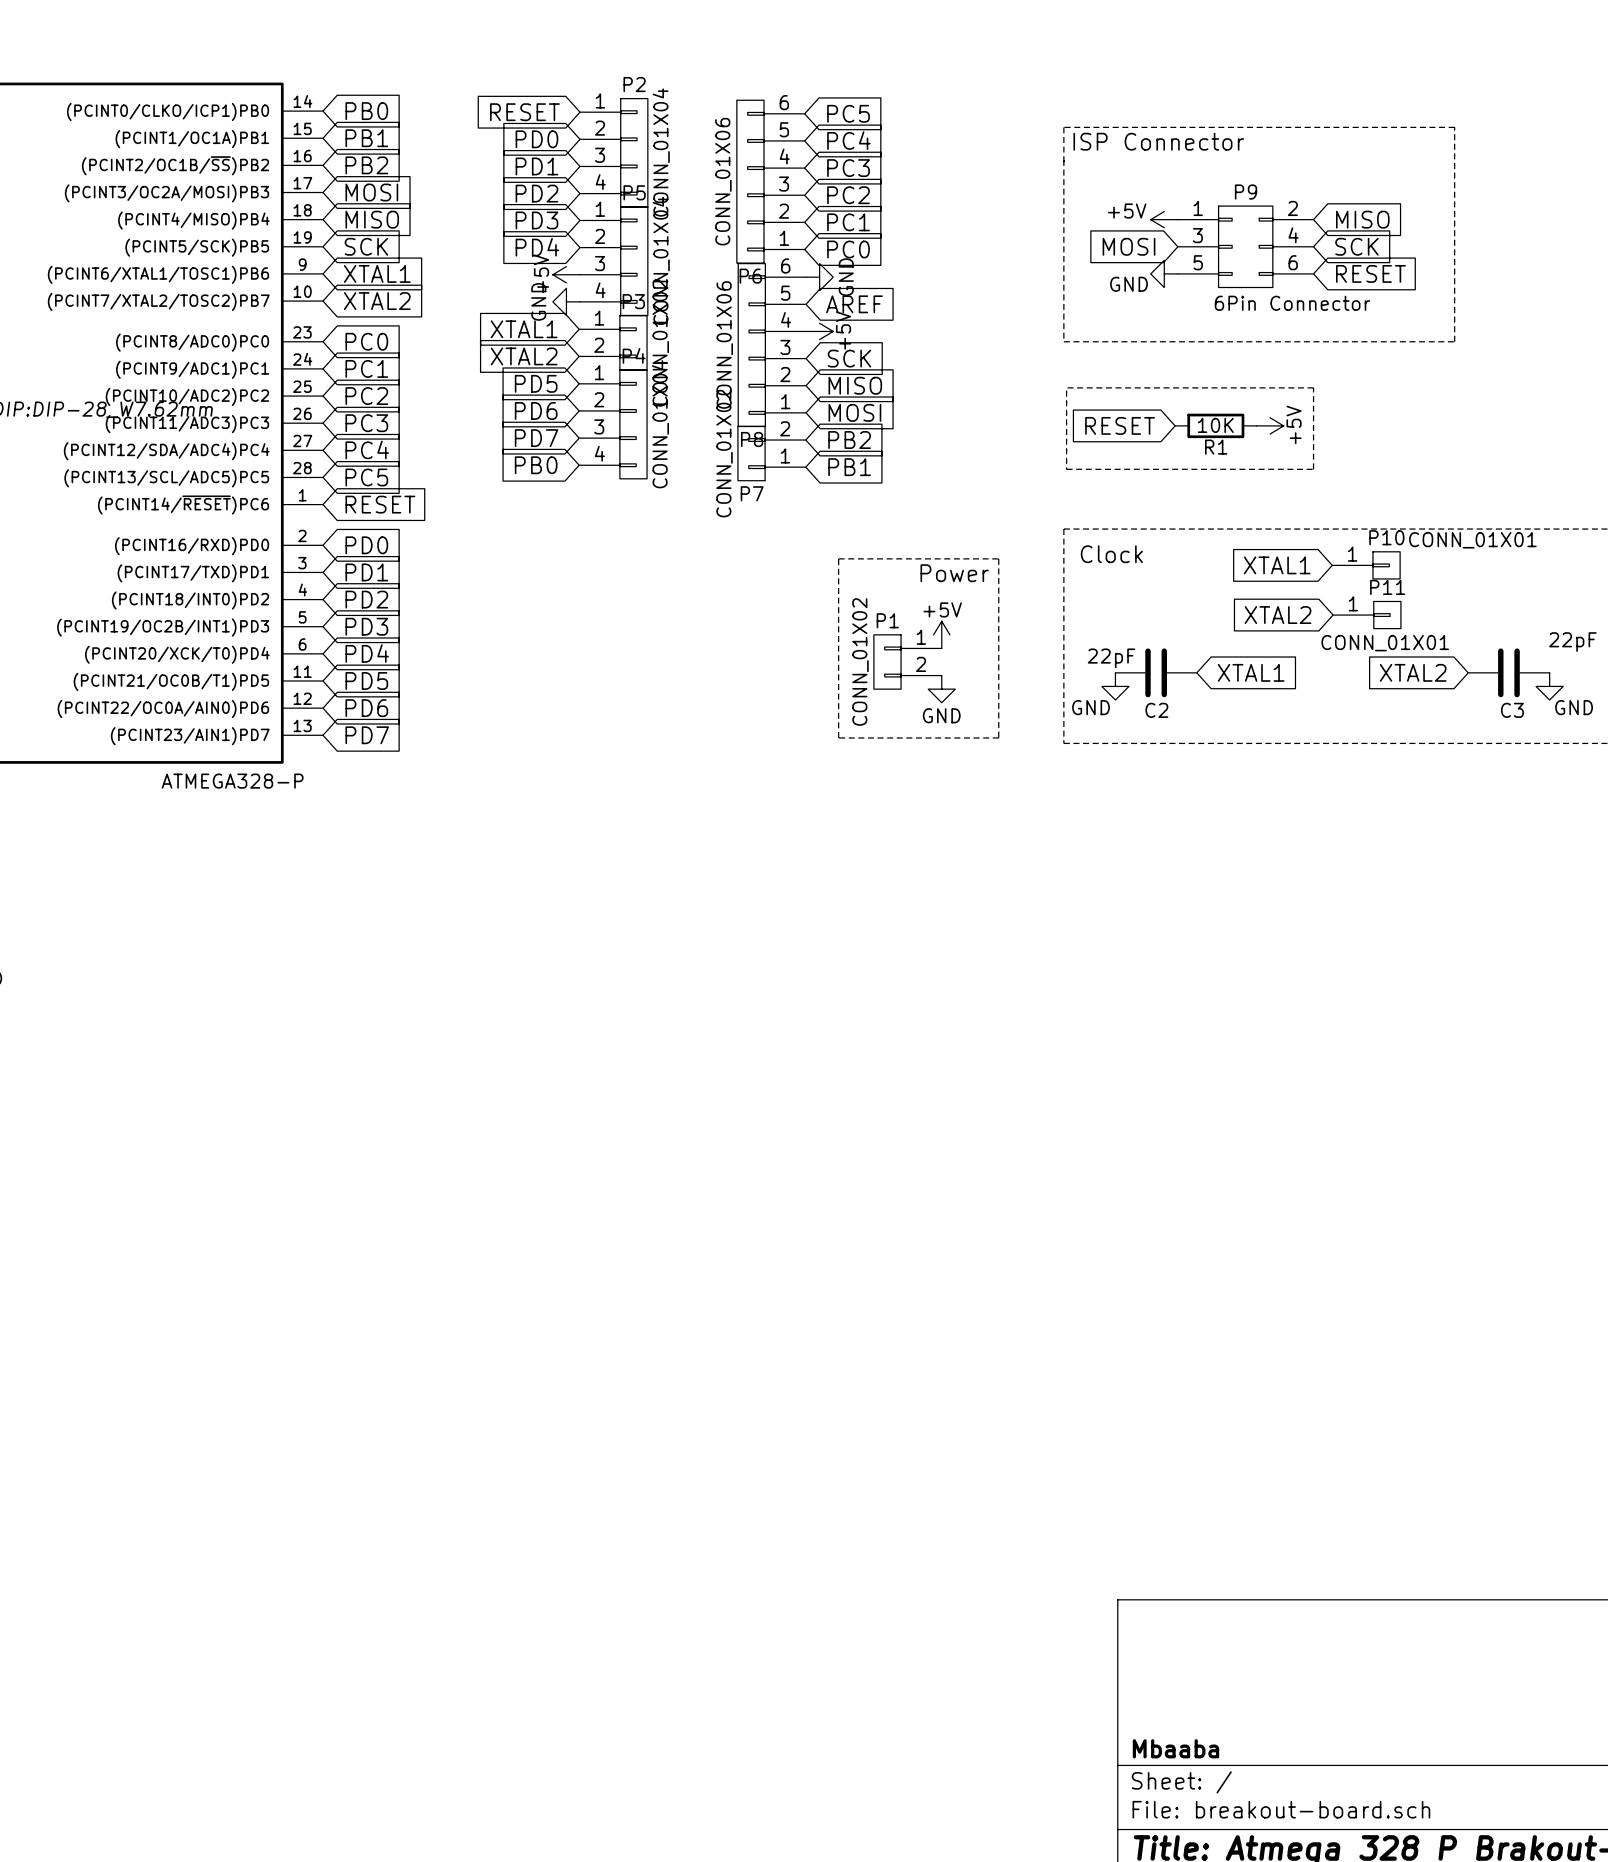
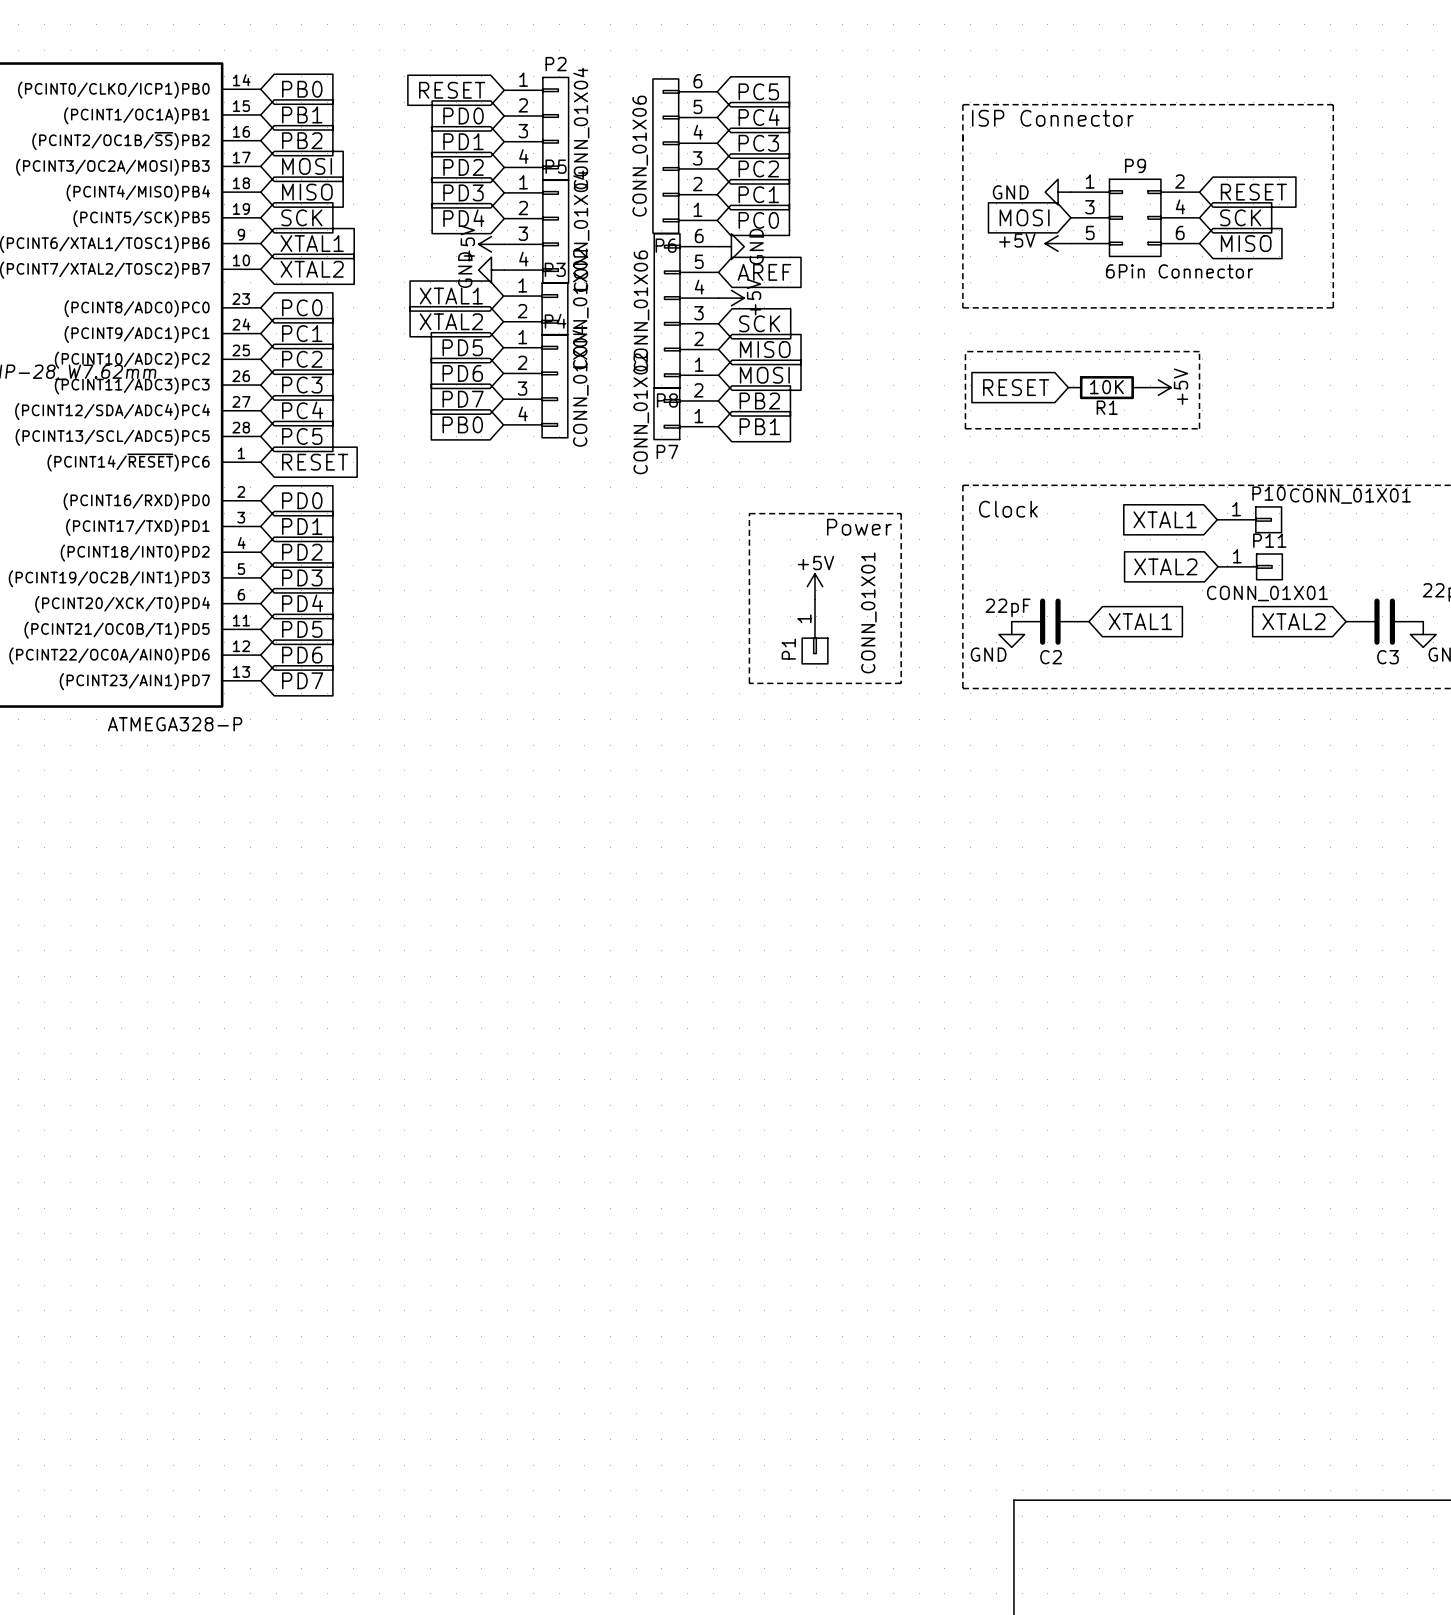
power symbol: +5V (1164, 219) -> GND (1058, 192)
global label: MISO (1362, 219) -> RESET (1253, 192)
power symbol: GND (1164, 273) -> +5V (1058, 243)
global label: RESET (1370, 273) -> MISO (1246, 243)
P1 name position: P1 (887, 620) -> P1 (788, 649)
P1 symbol: [873, 634, 942, 690] -> [802, 599, 828, 664]
power symbol position: +5V (941, 634) -> +5V (815, 586)
P1 value: CONN_01X02 (860, 662) -> CONN_01X01 (868, 612)
power symbol: GND (941, 689) -> none

